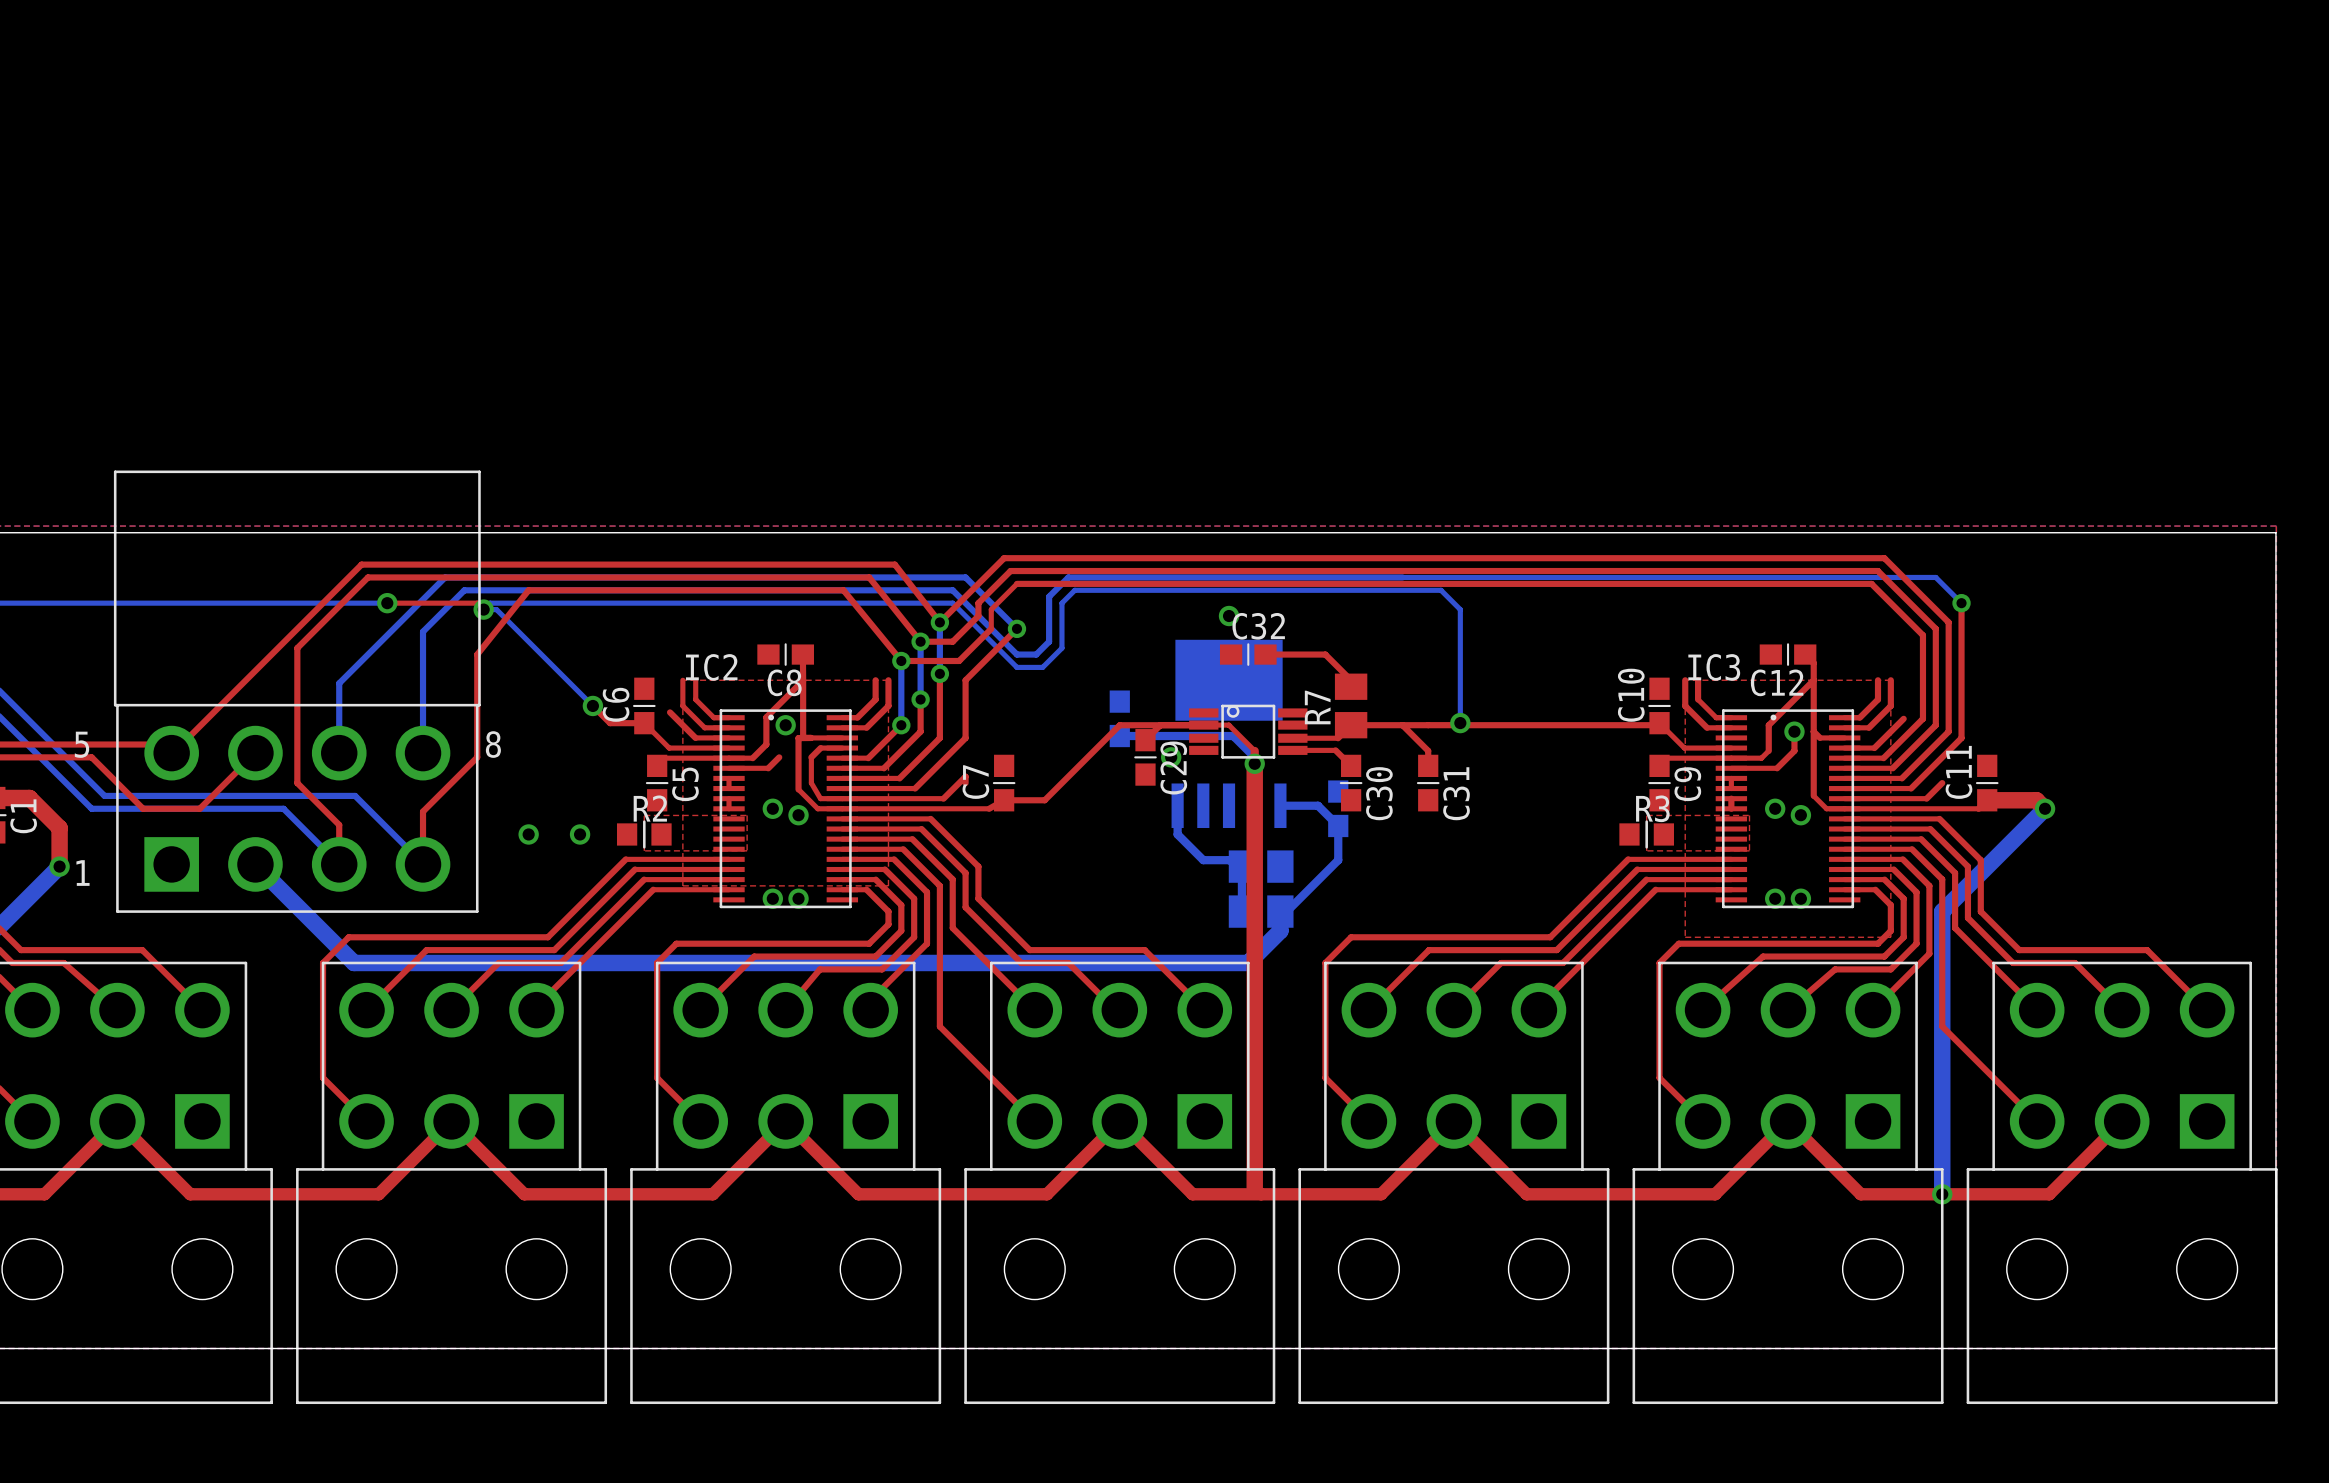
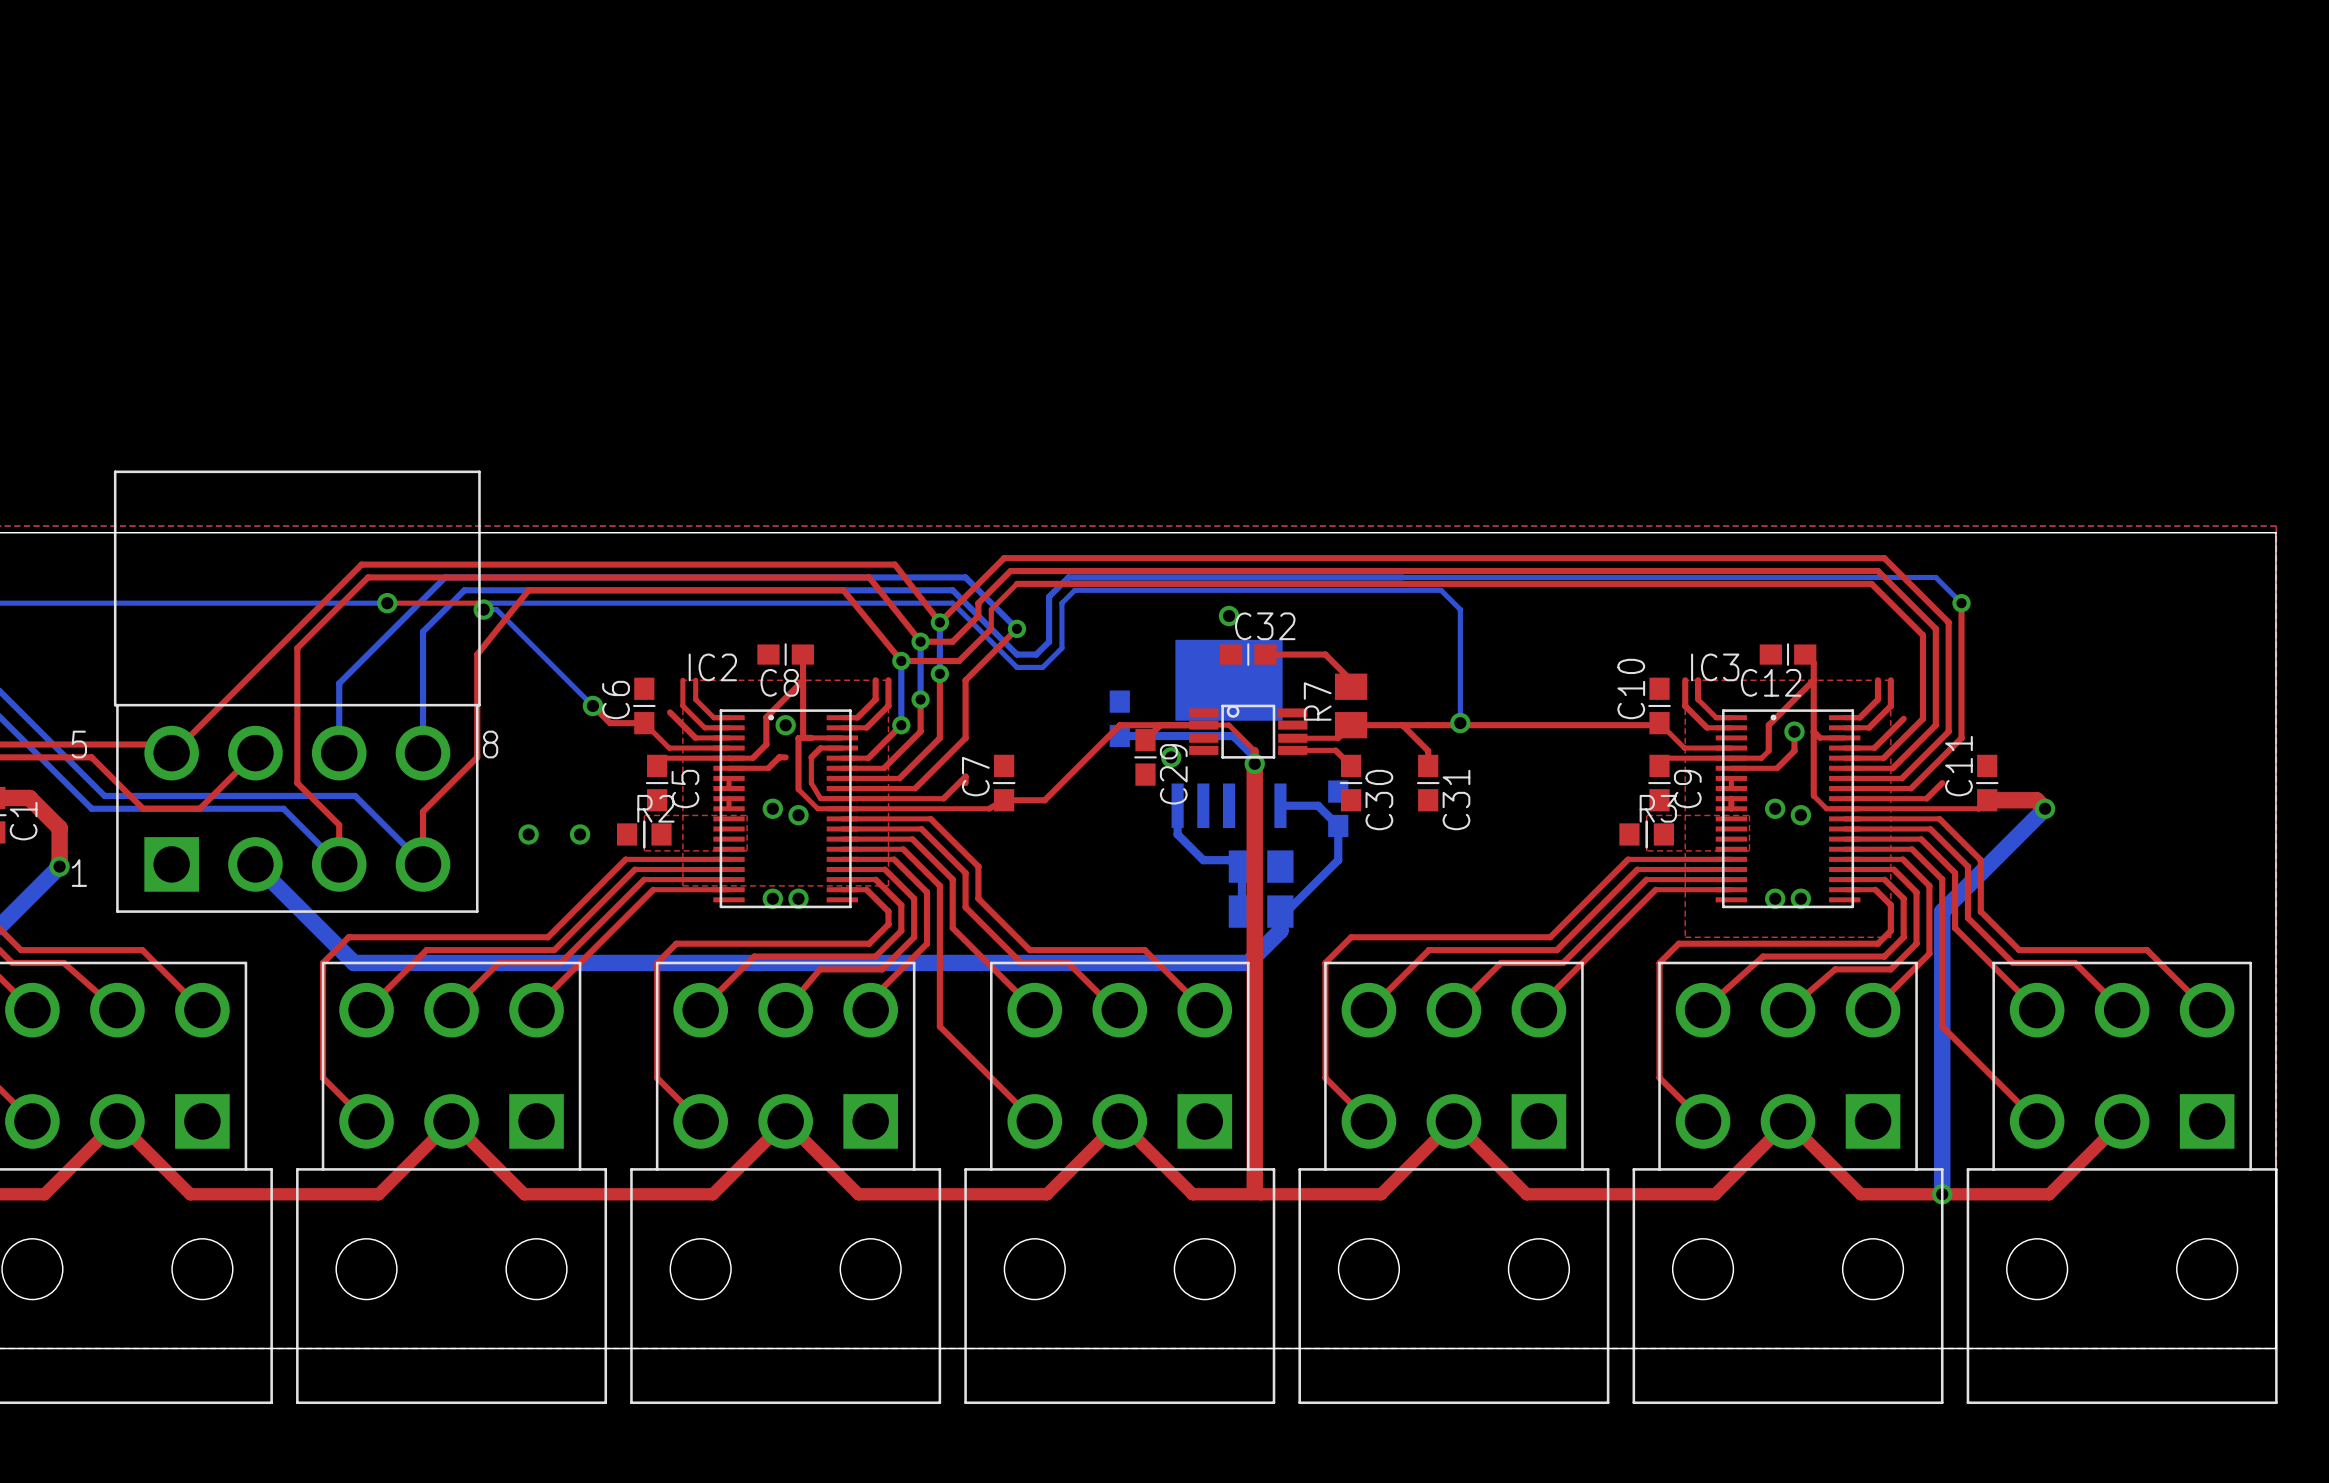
top track: none -> (779, 757) (785, 757)

